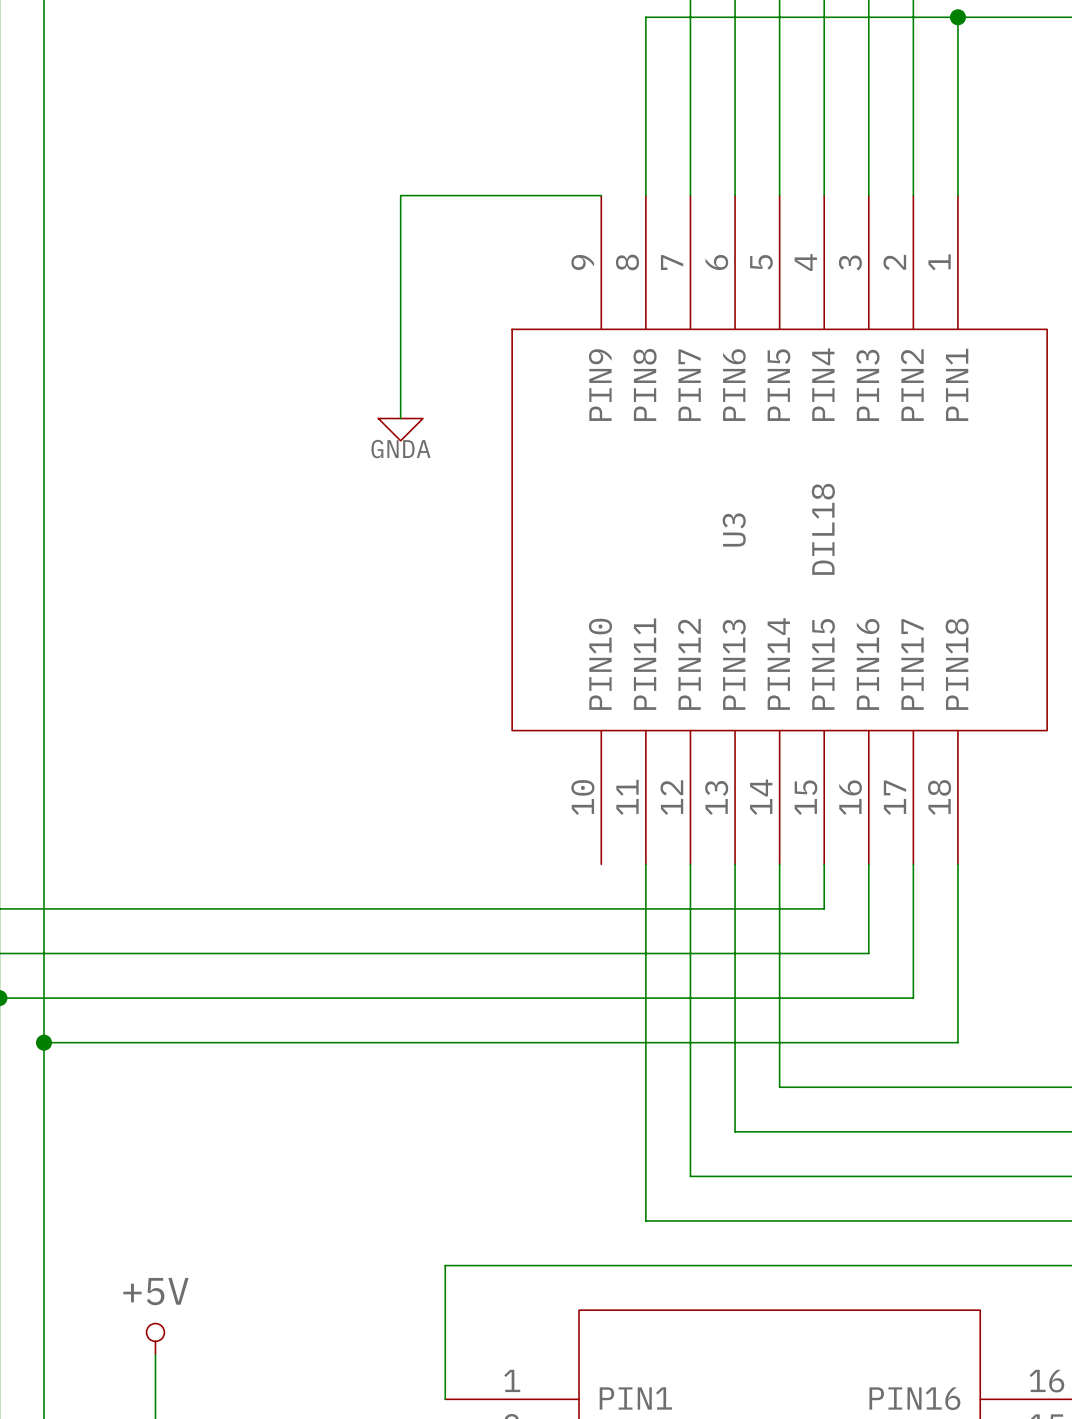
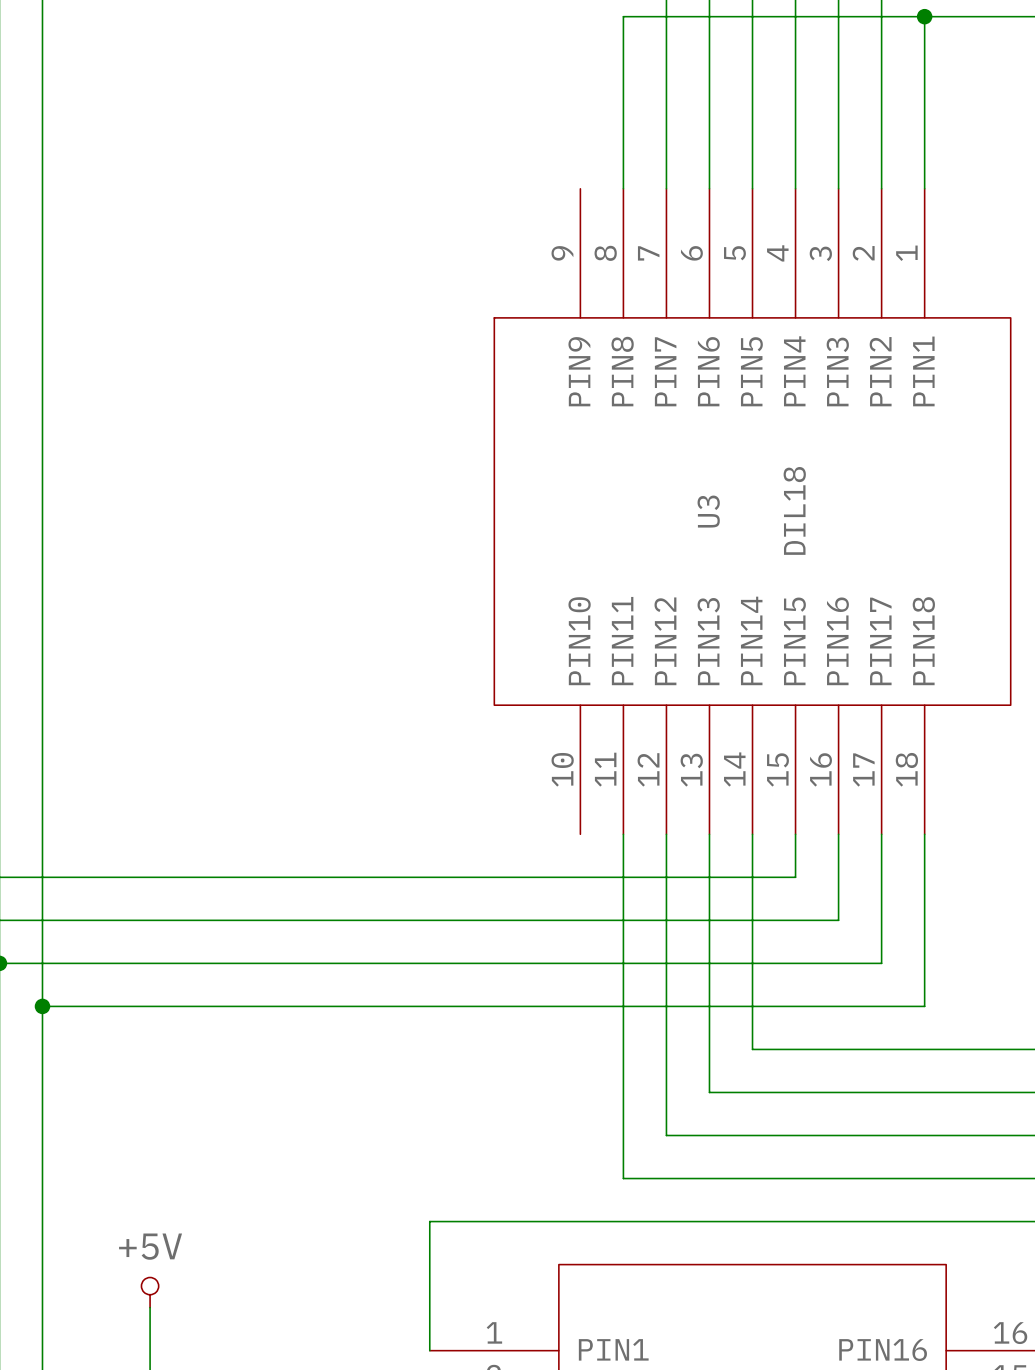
wire: (601, 195) (400, 195) (400, 418) -> none
power symbol: GNDA (400, 429) -> none

